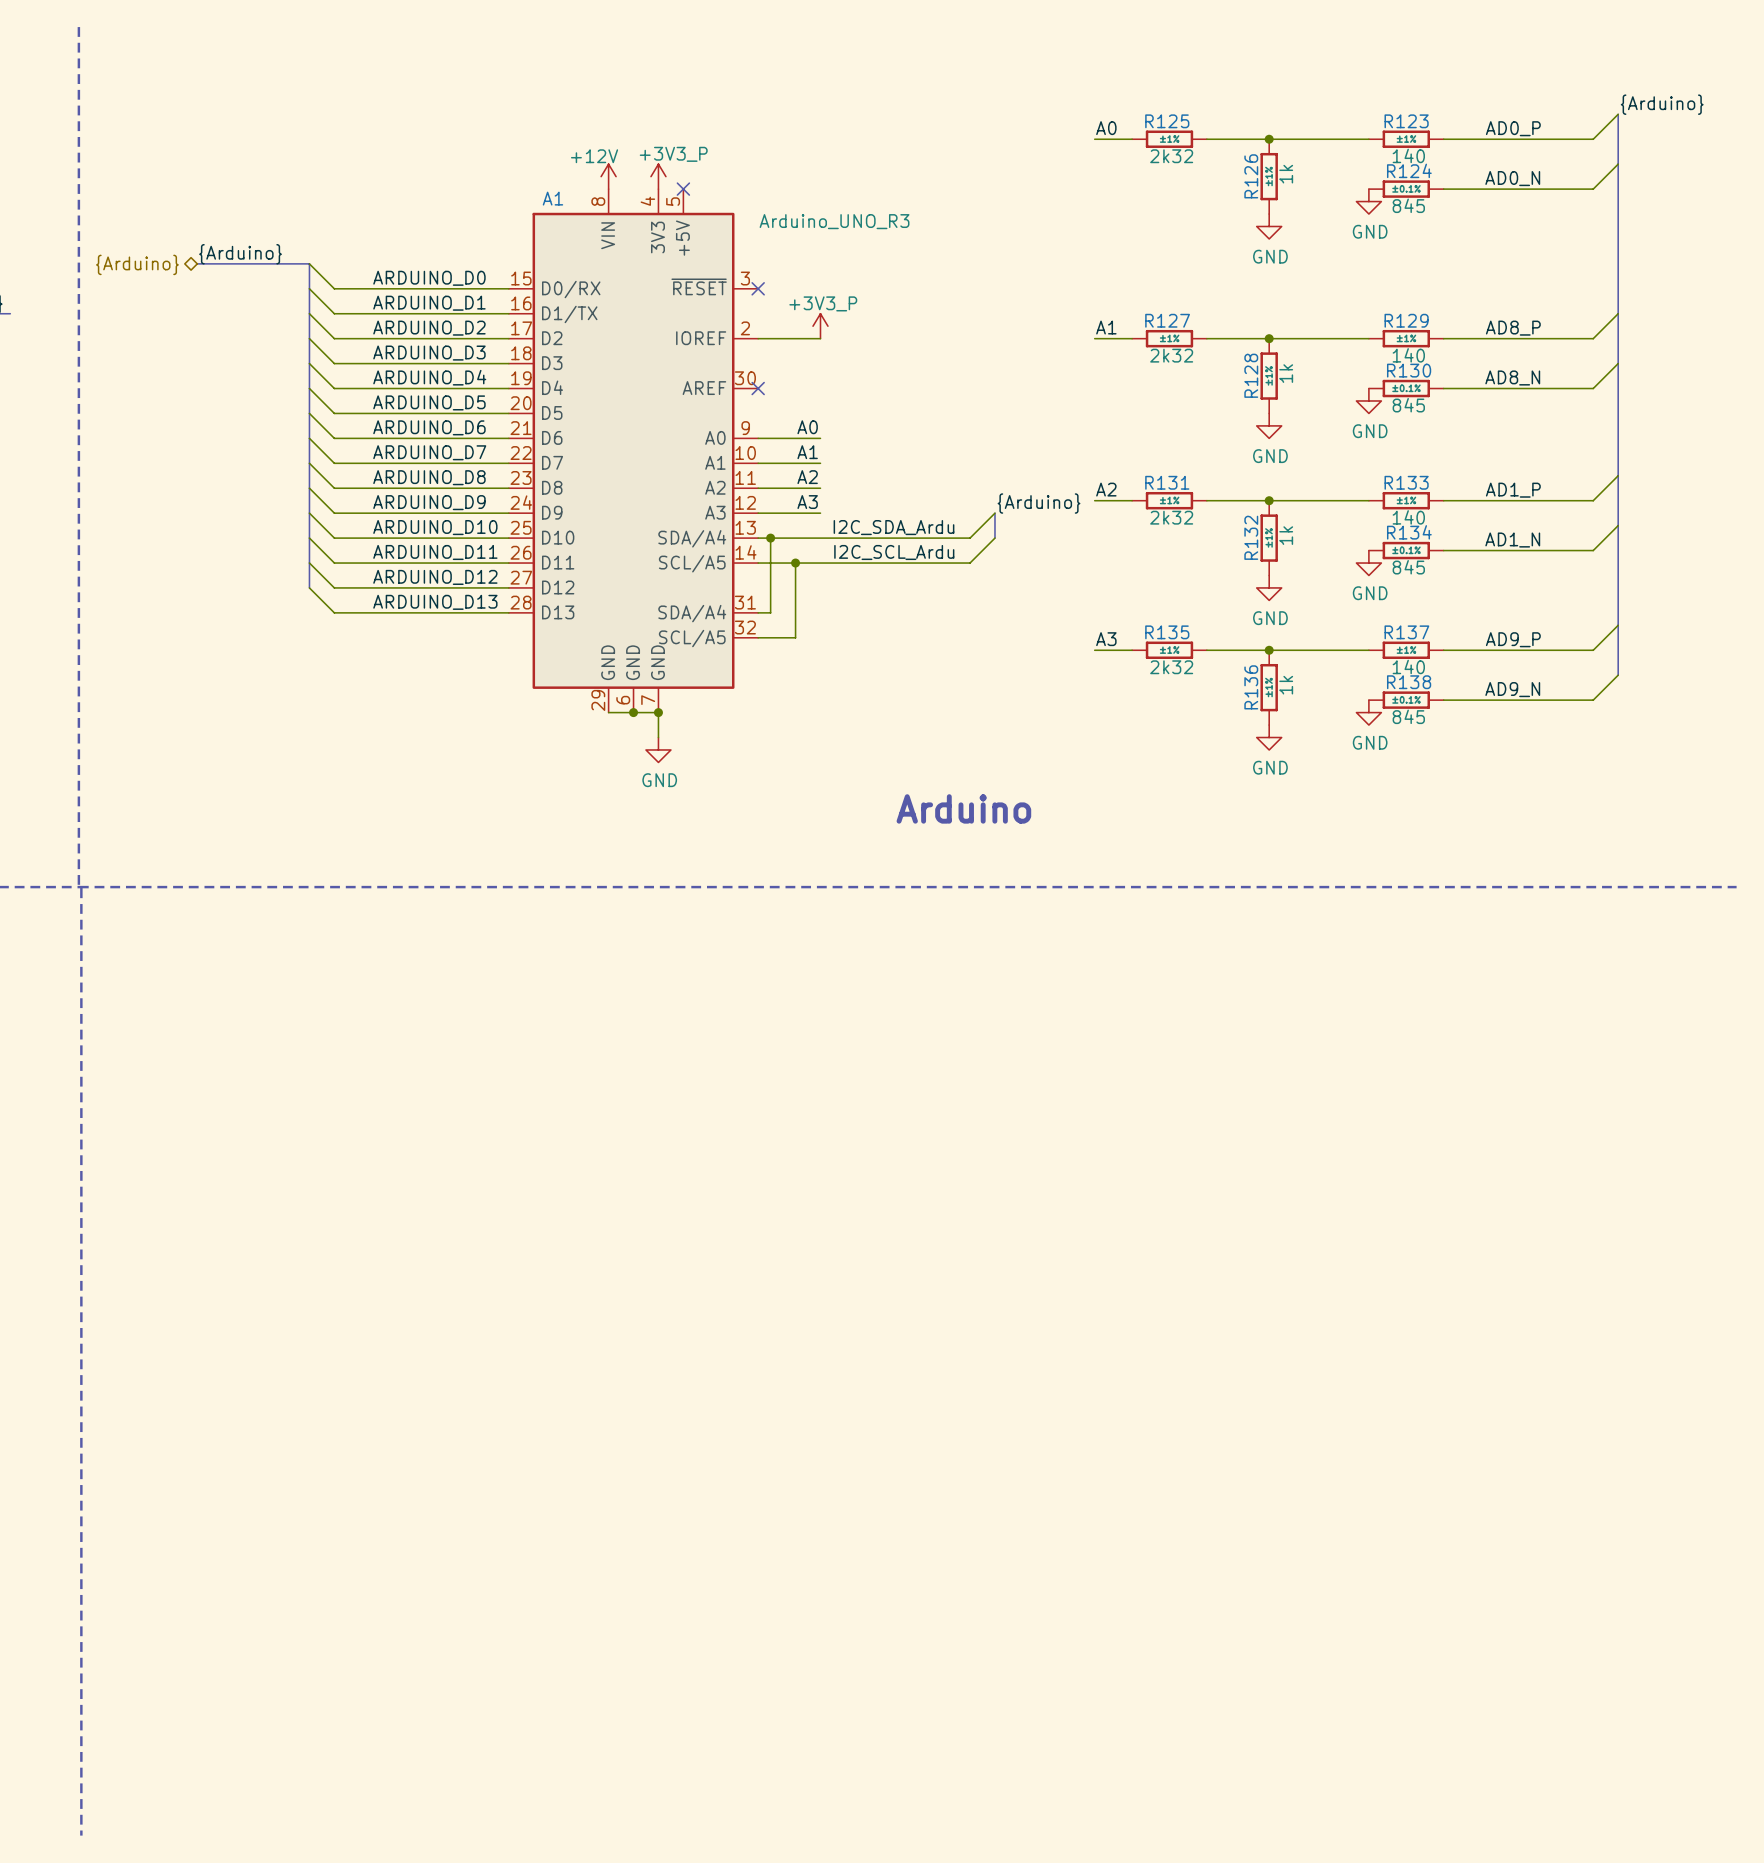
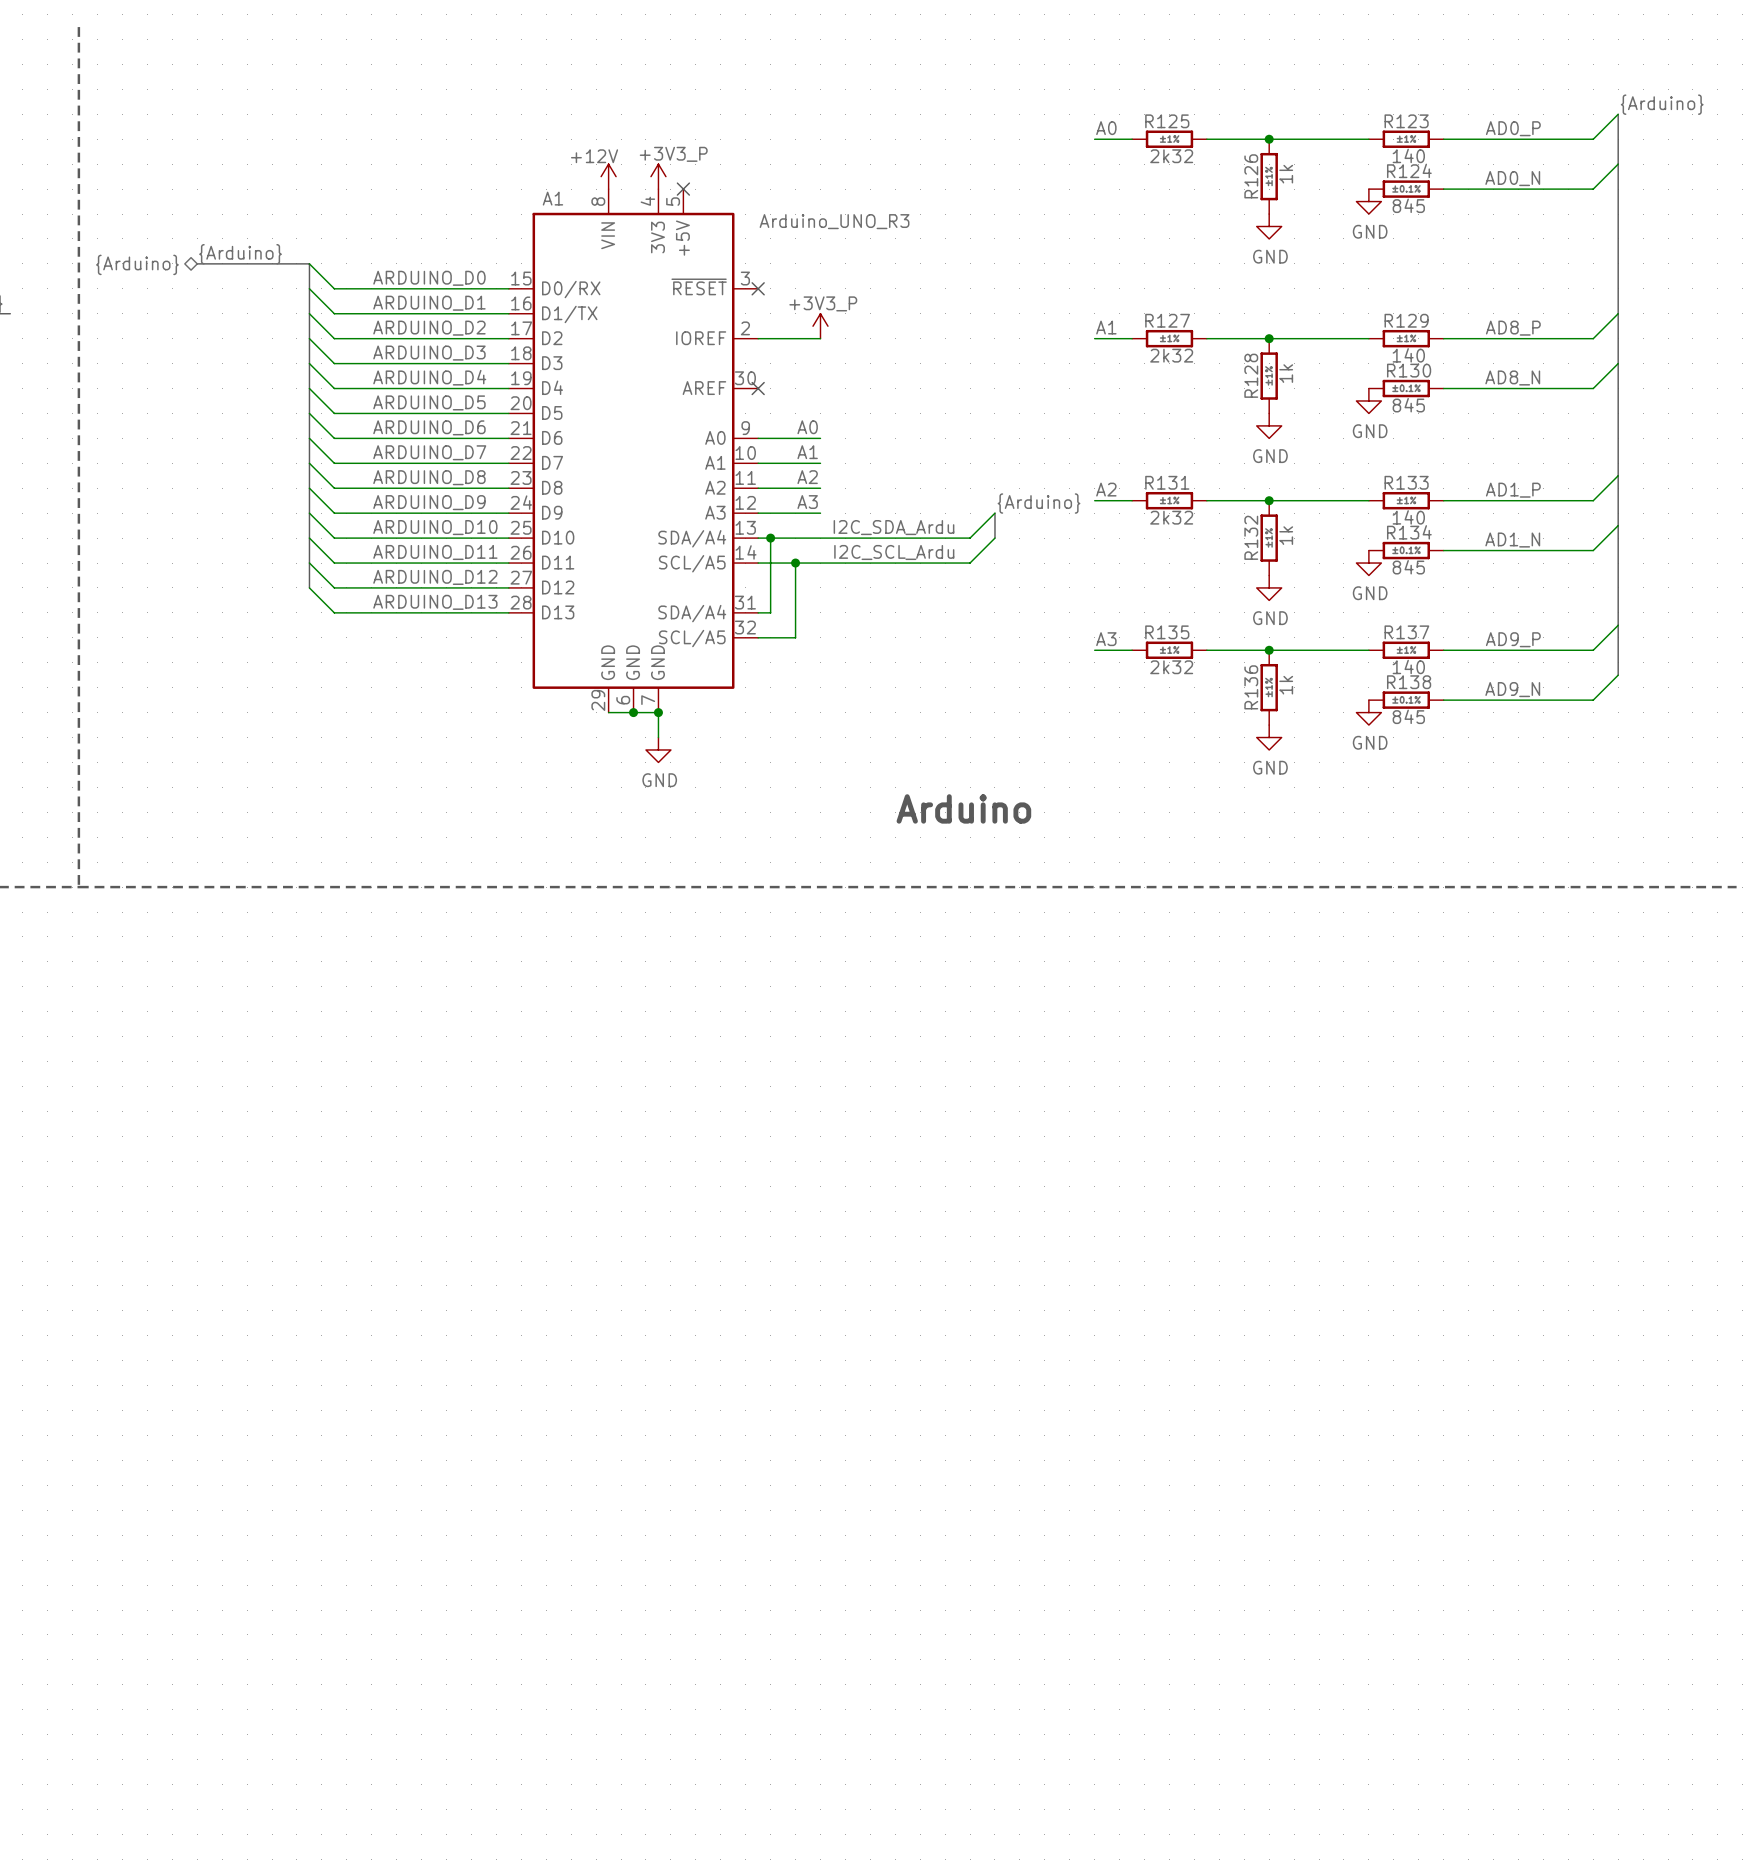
line: (81, 888) (81, 1835) -> none

